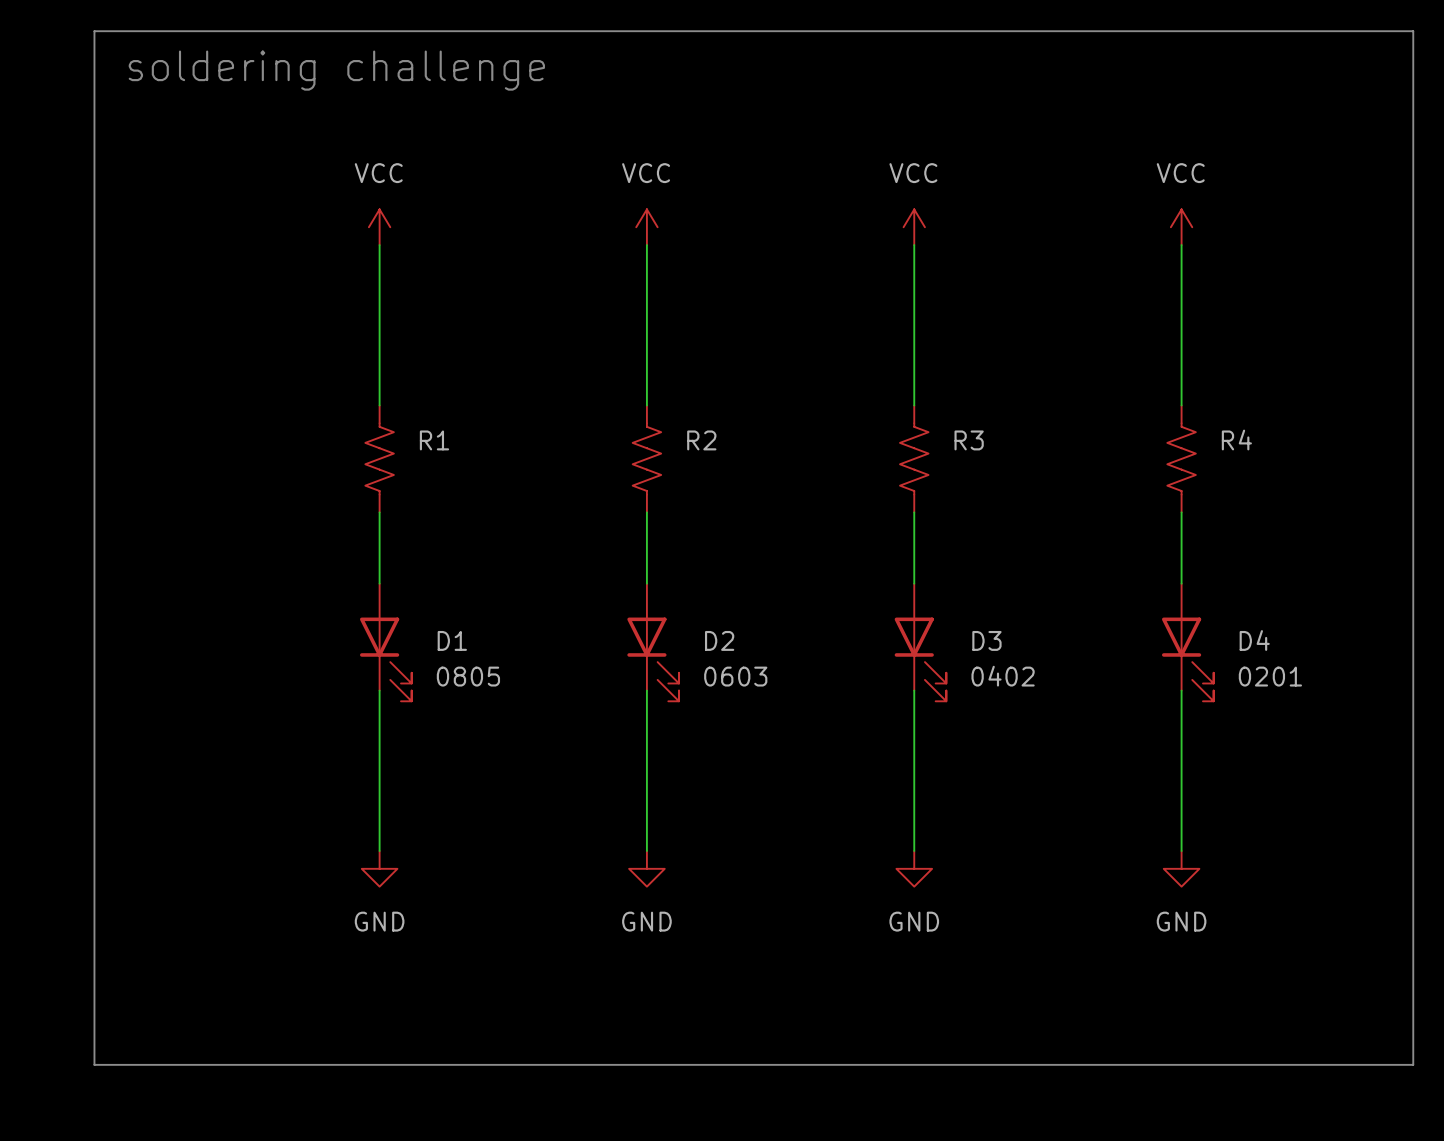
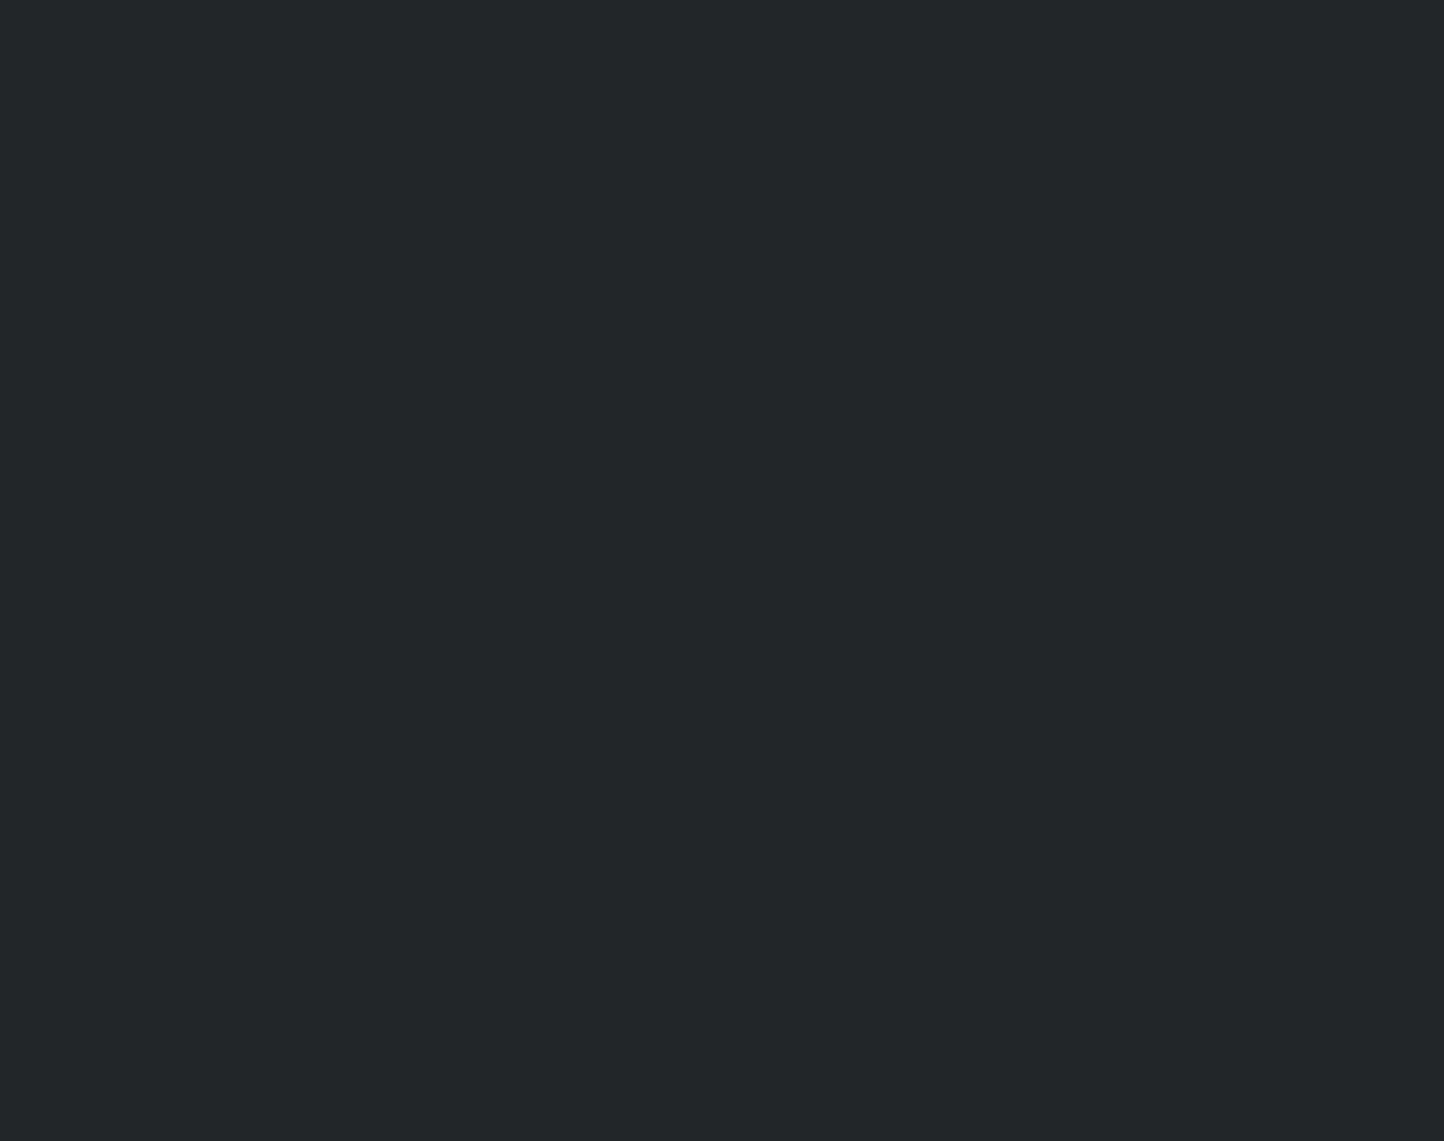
line: (94, 31) (1413, 31) (1413, 1064) (94, 1064) (94, 31) -> none
text: soldering challenge (336, 70) -> none
power symbol: VCC (379, 227) -> none
power symbol: VCC (646, 227) -> none
power symbol: VCC (914, 227) -> none
power symbol: VCC (1181, 227) -> none
wire: (379, 245) (379, 405) -> none
wire: (646, 245) (646, 405) -> none
wire: (914, 245) (914, 405) -> none
wire: (1181, 245) (1181, 405) -> none
R1: (379, 458) -> none
R2: (646, 458) -> none
R3: (914, 458) -> none
R4: (1181, 458) -> none
wire: (379, 512) (379, 583) -> none
wire: (646, 512) (646, 583) -> none
wire: (914, 512) (914, 583) -> none
wire: (1181, 512) (1181, 583) -> none
D1: 0805 (385, 642) -> none
D2: 0603 (653, 642) -> none
D3: 0402 (920, 642) -> none
D4: 0201 (1187, 642) -> none
wire: (379, 690) (379, 851) -> none
wire: (646, 690) (646, 851) -> none
wire: (914, 690) (914, 851) -> none
wire: (1181, 690) (1181, 851) -> none
power symbol: GND (379, 868) -> none
power symbol: GND (646, 868) -> none
power symbol: GND (914, 868) -> none
power symbol: GND (1181, 868) -> none

